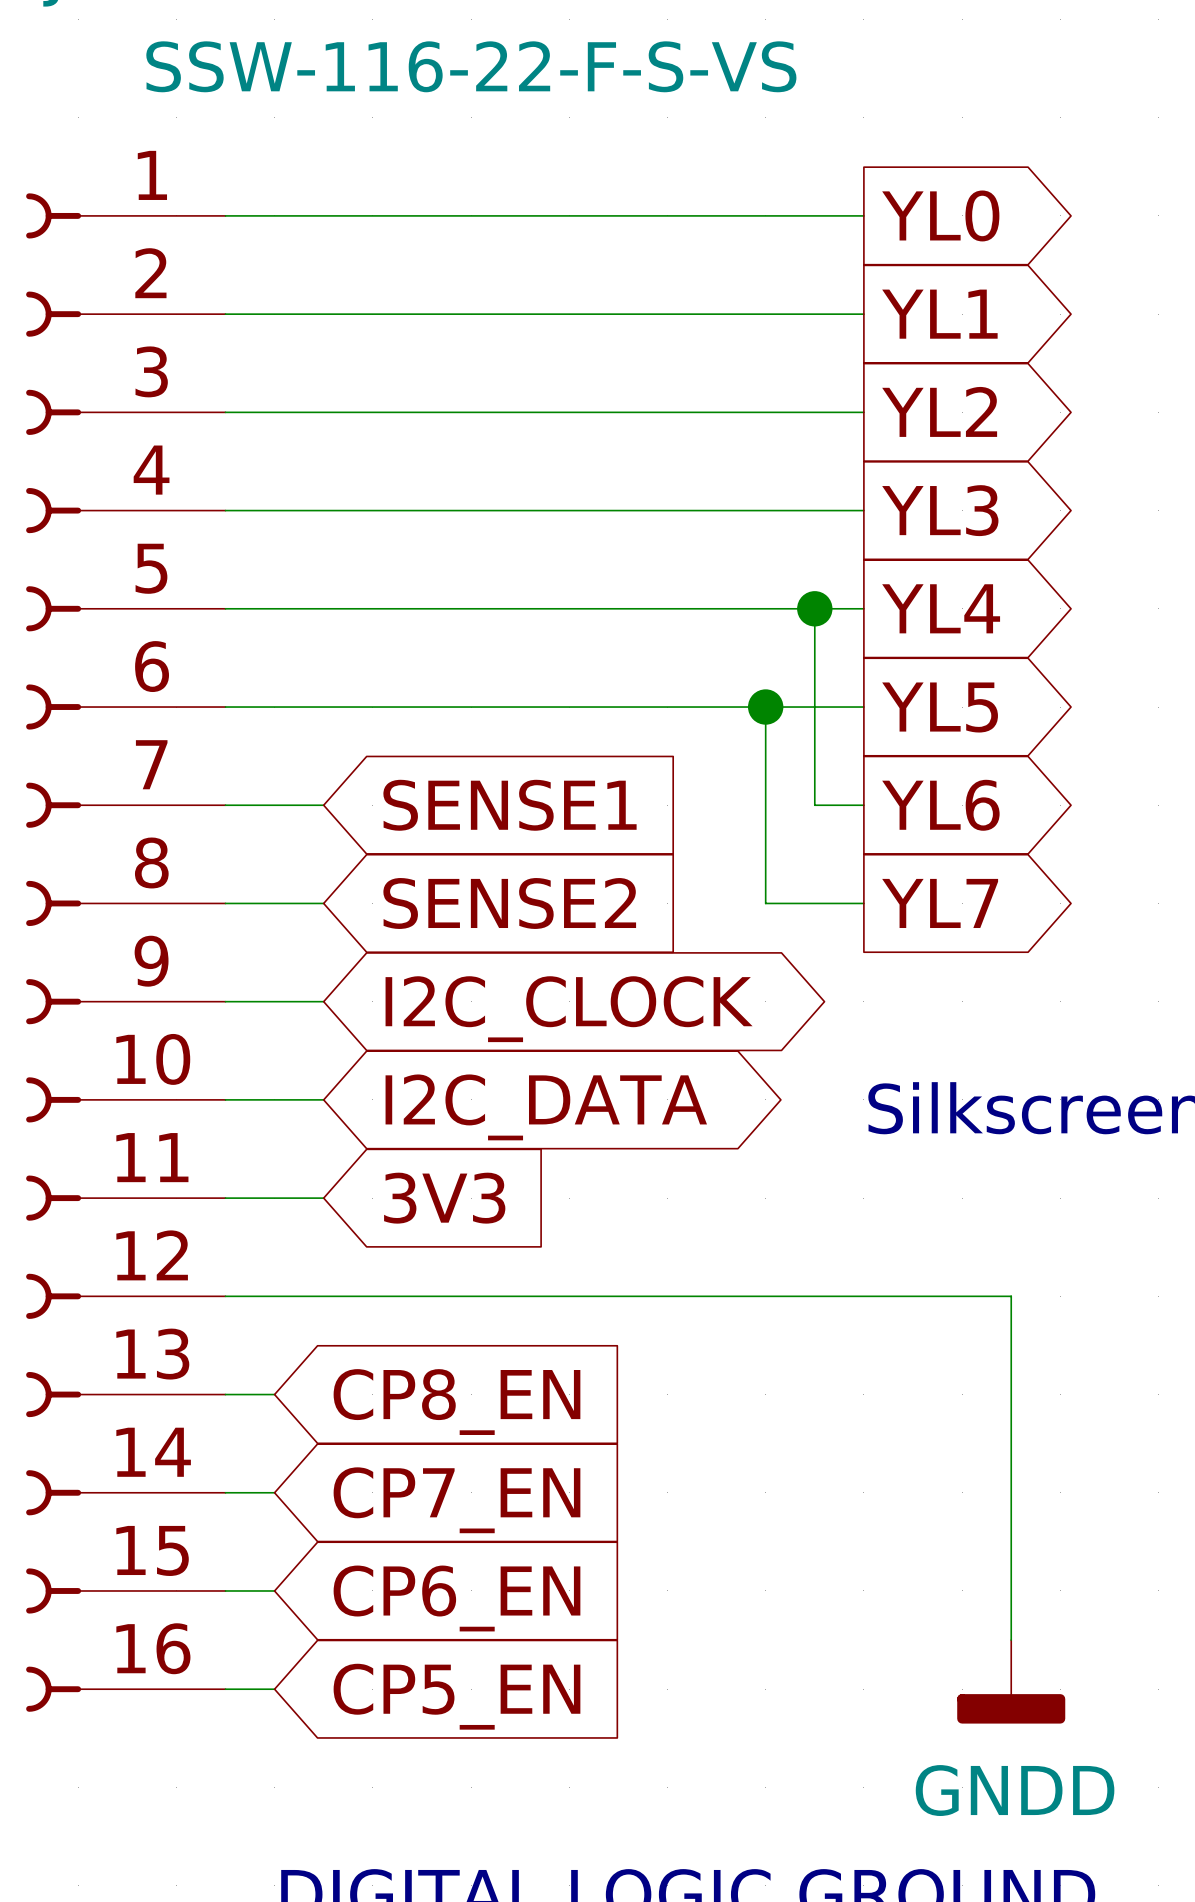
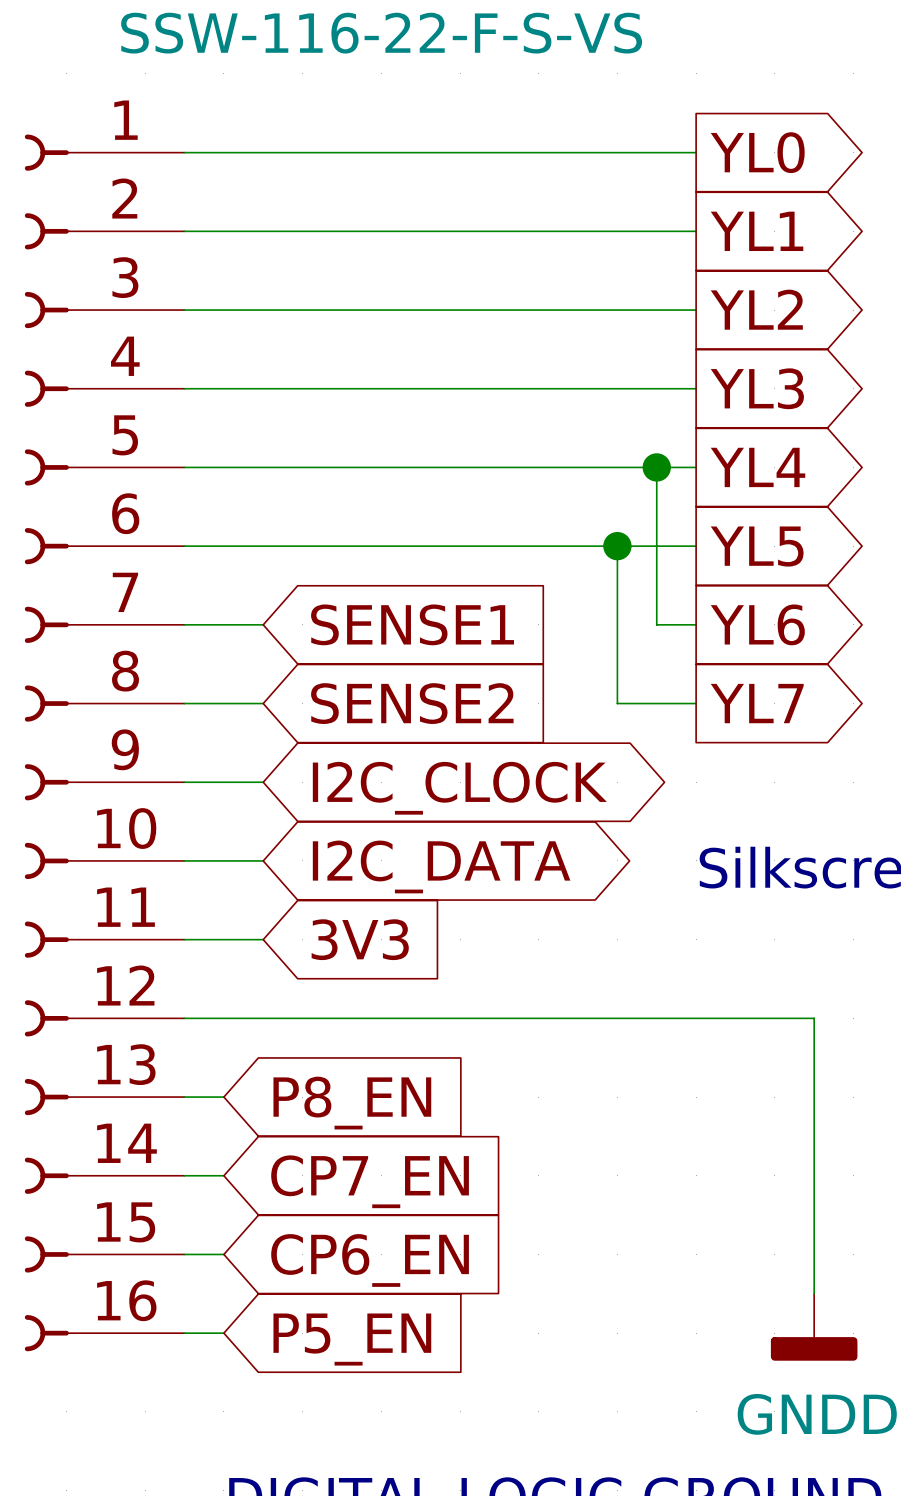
global label: CP8_EN (456, 1402) -> P8_EN (352, 1103)
global label: CP5_EN (456, 1696) -> P5_EN (352, 1339)

